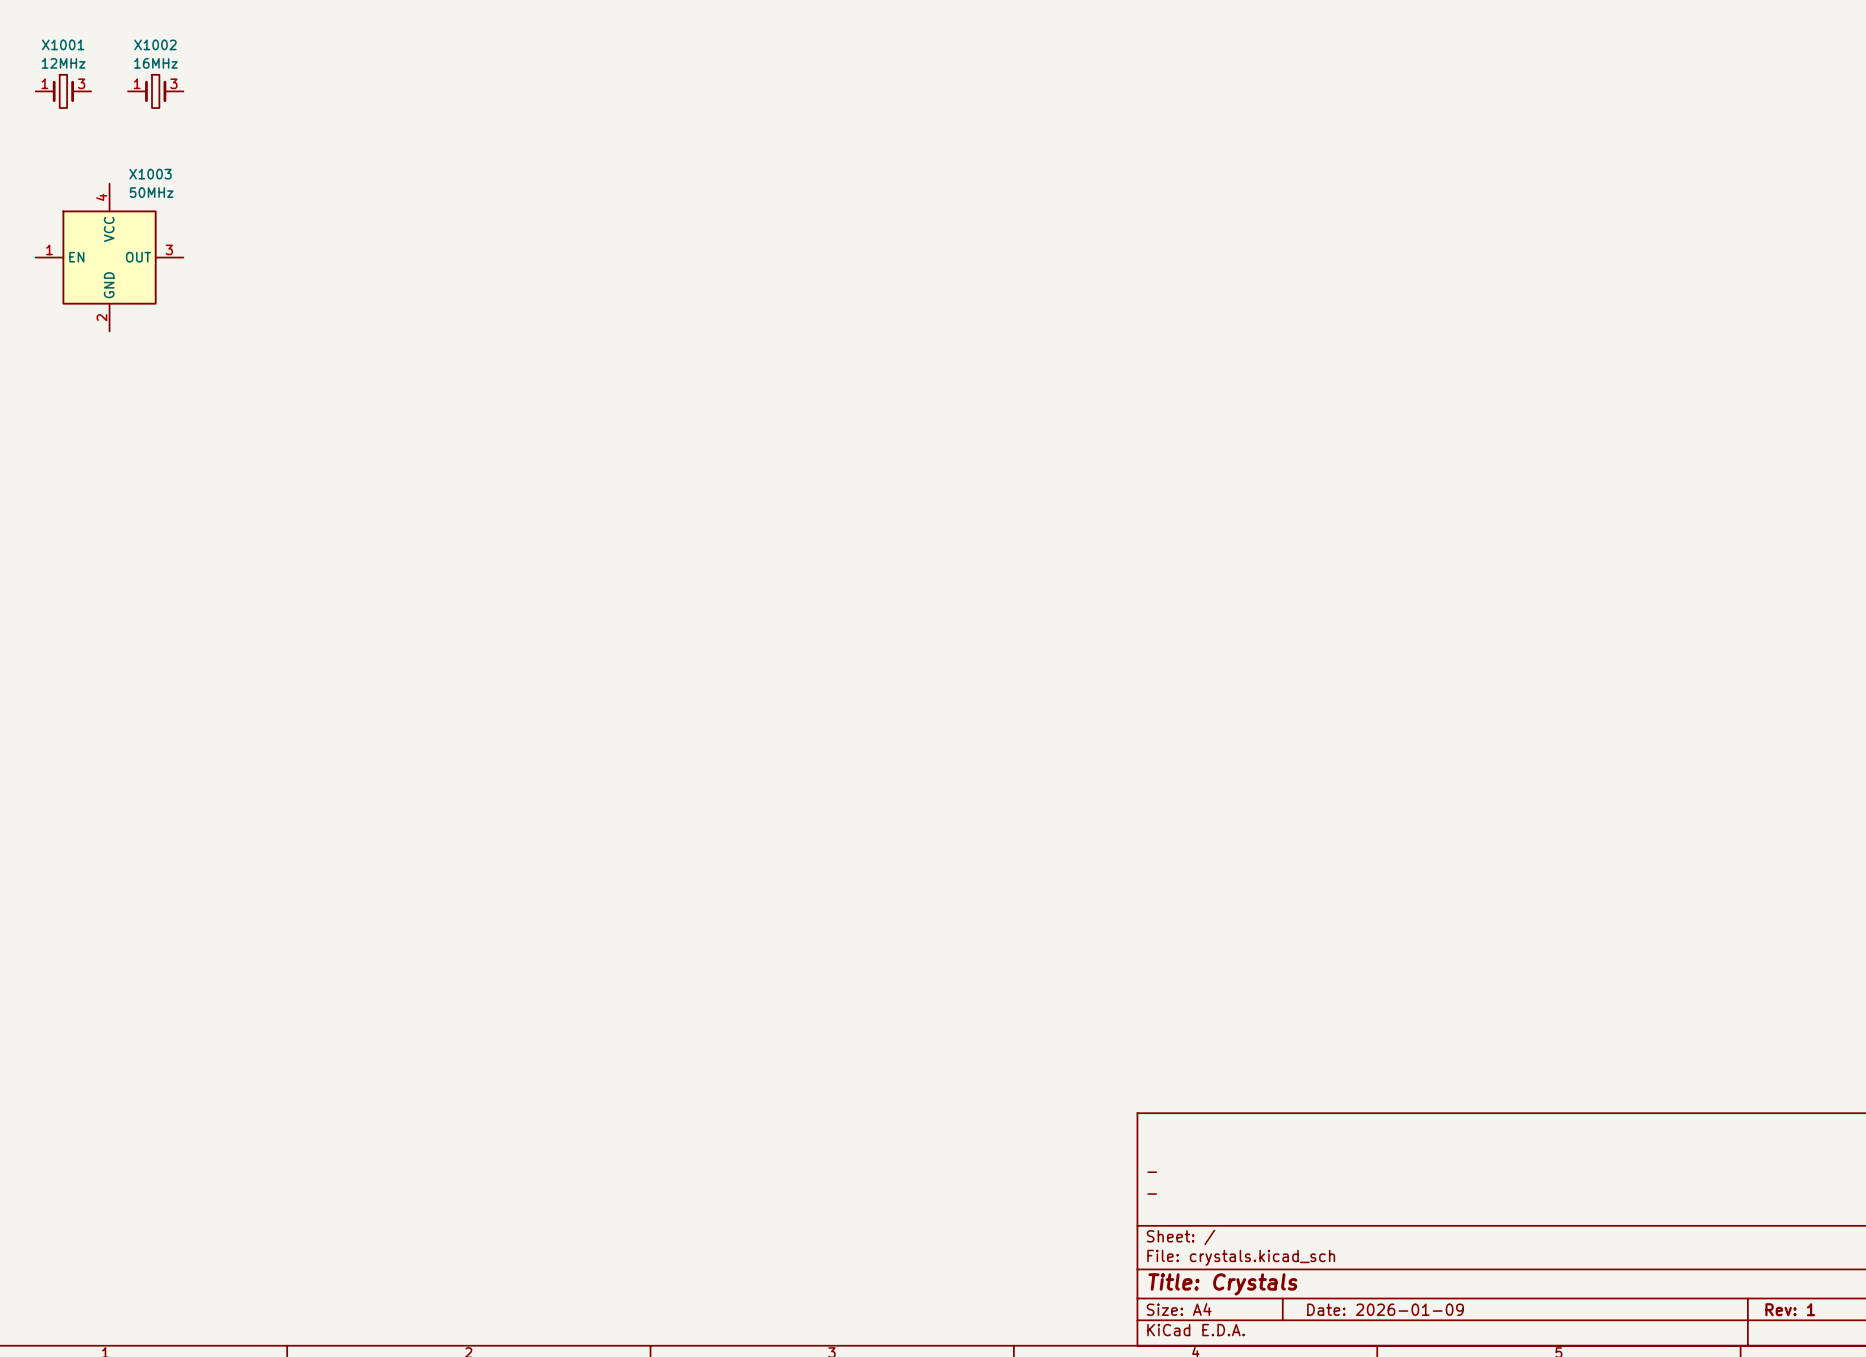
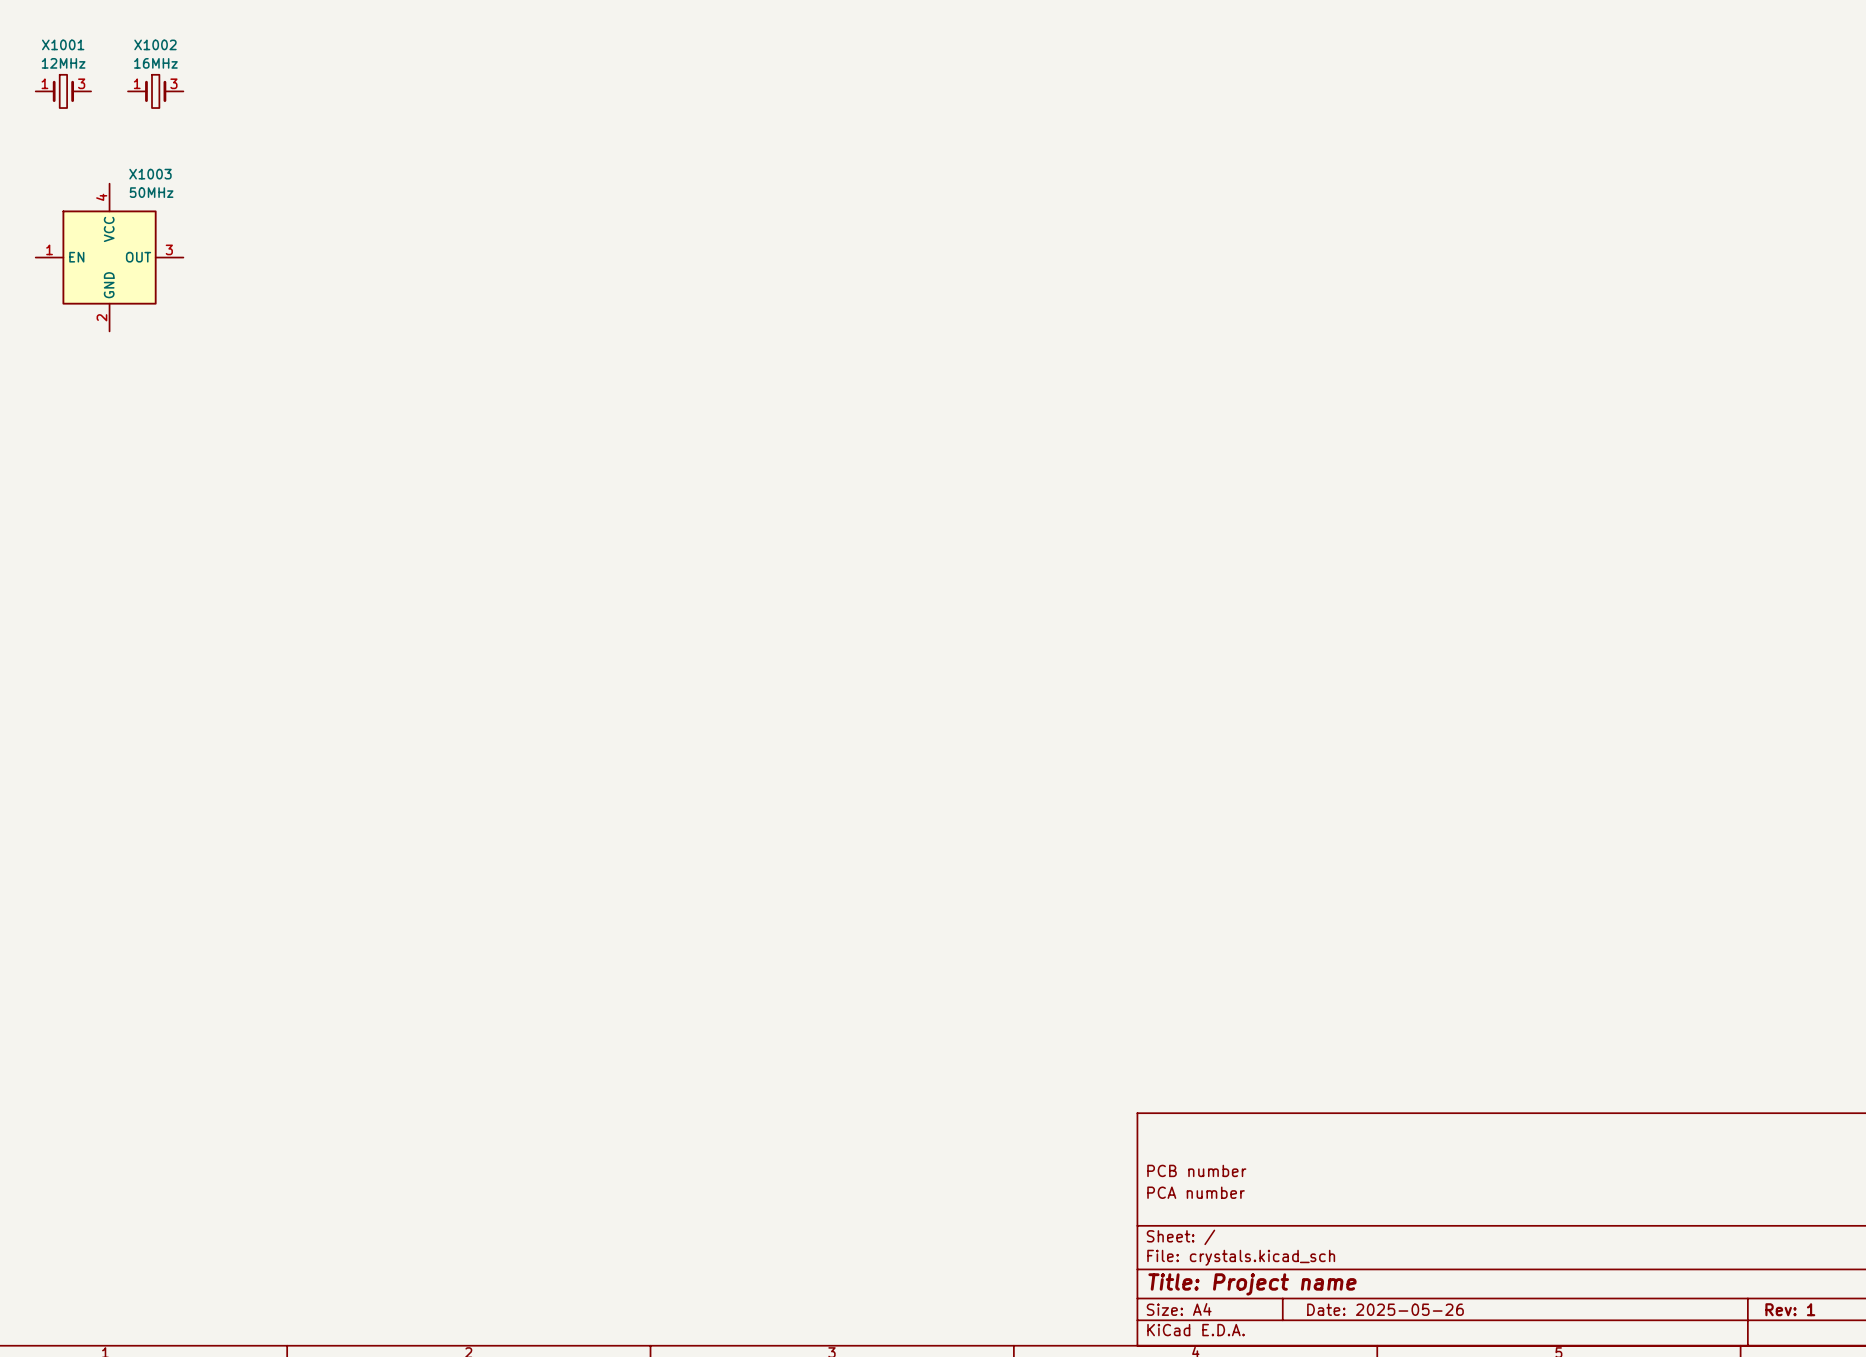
title block: - (1152, 1172) -> PCB number (1196, 1170)
title block: - (1152, 1194) -> PCA number (1196, 1192)
title block: Title: Crystals (1222, 1284) -> Title: Project name (1252, 1284)
title block: Date: 2026-01-09 (1385, 1309) -> Date: 2025-05-26 (1385, 1309)

